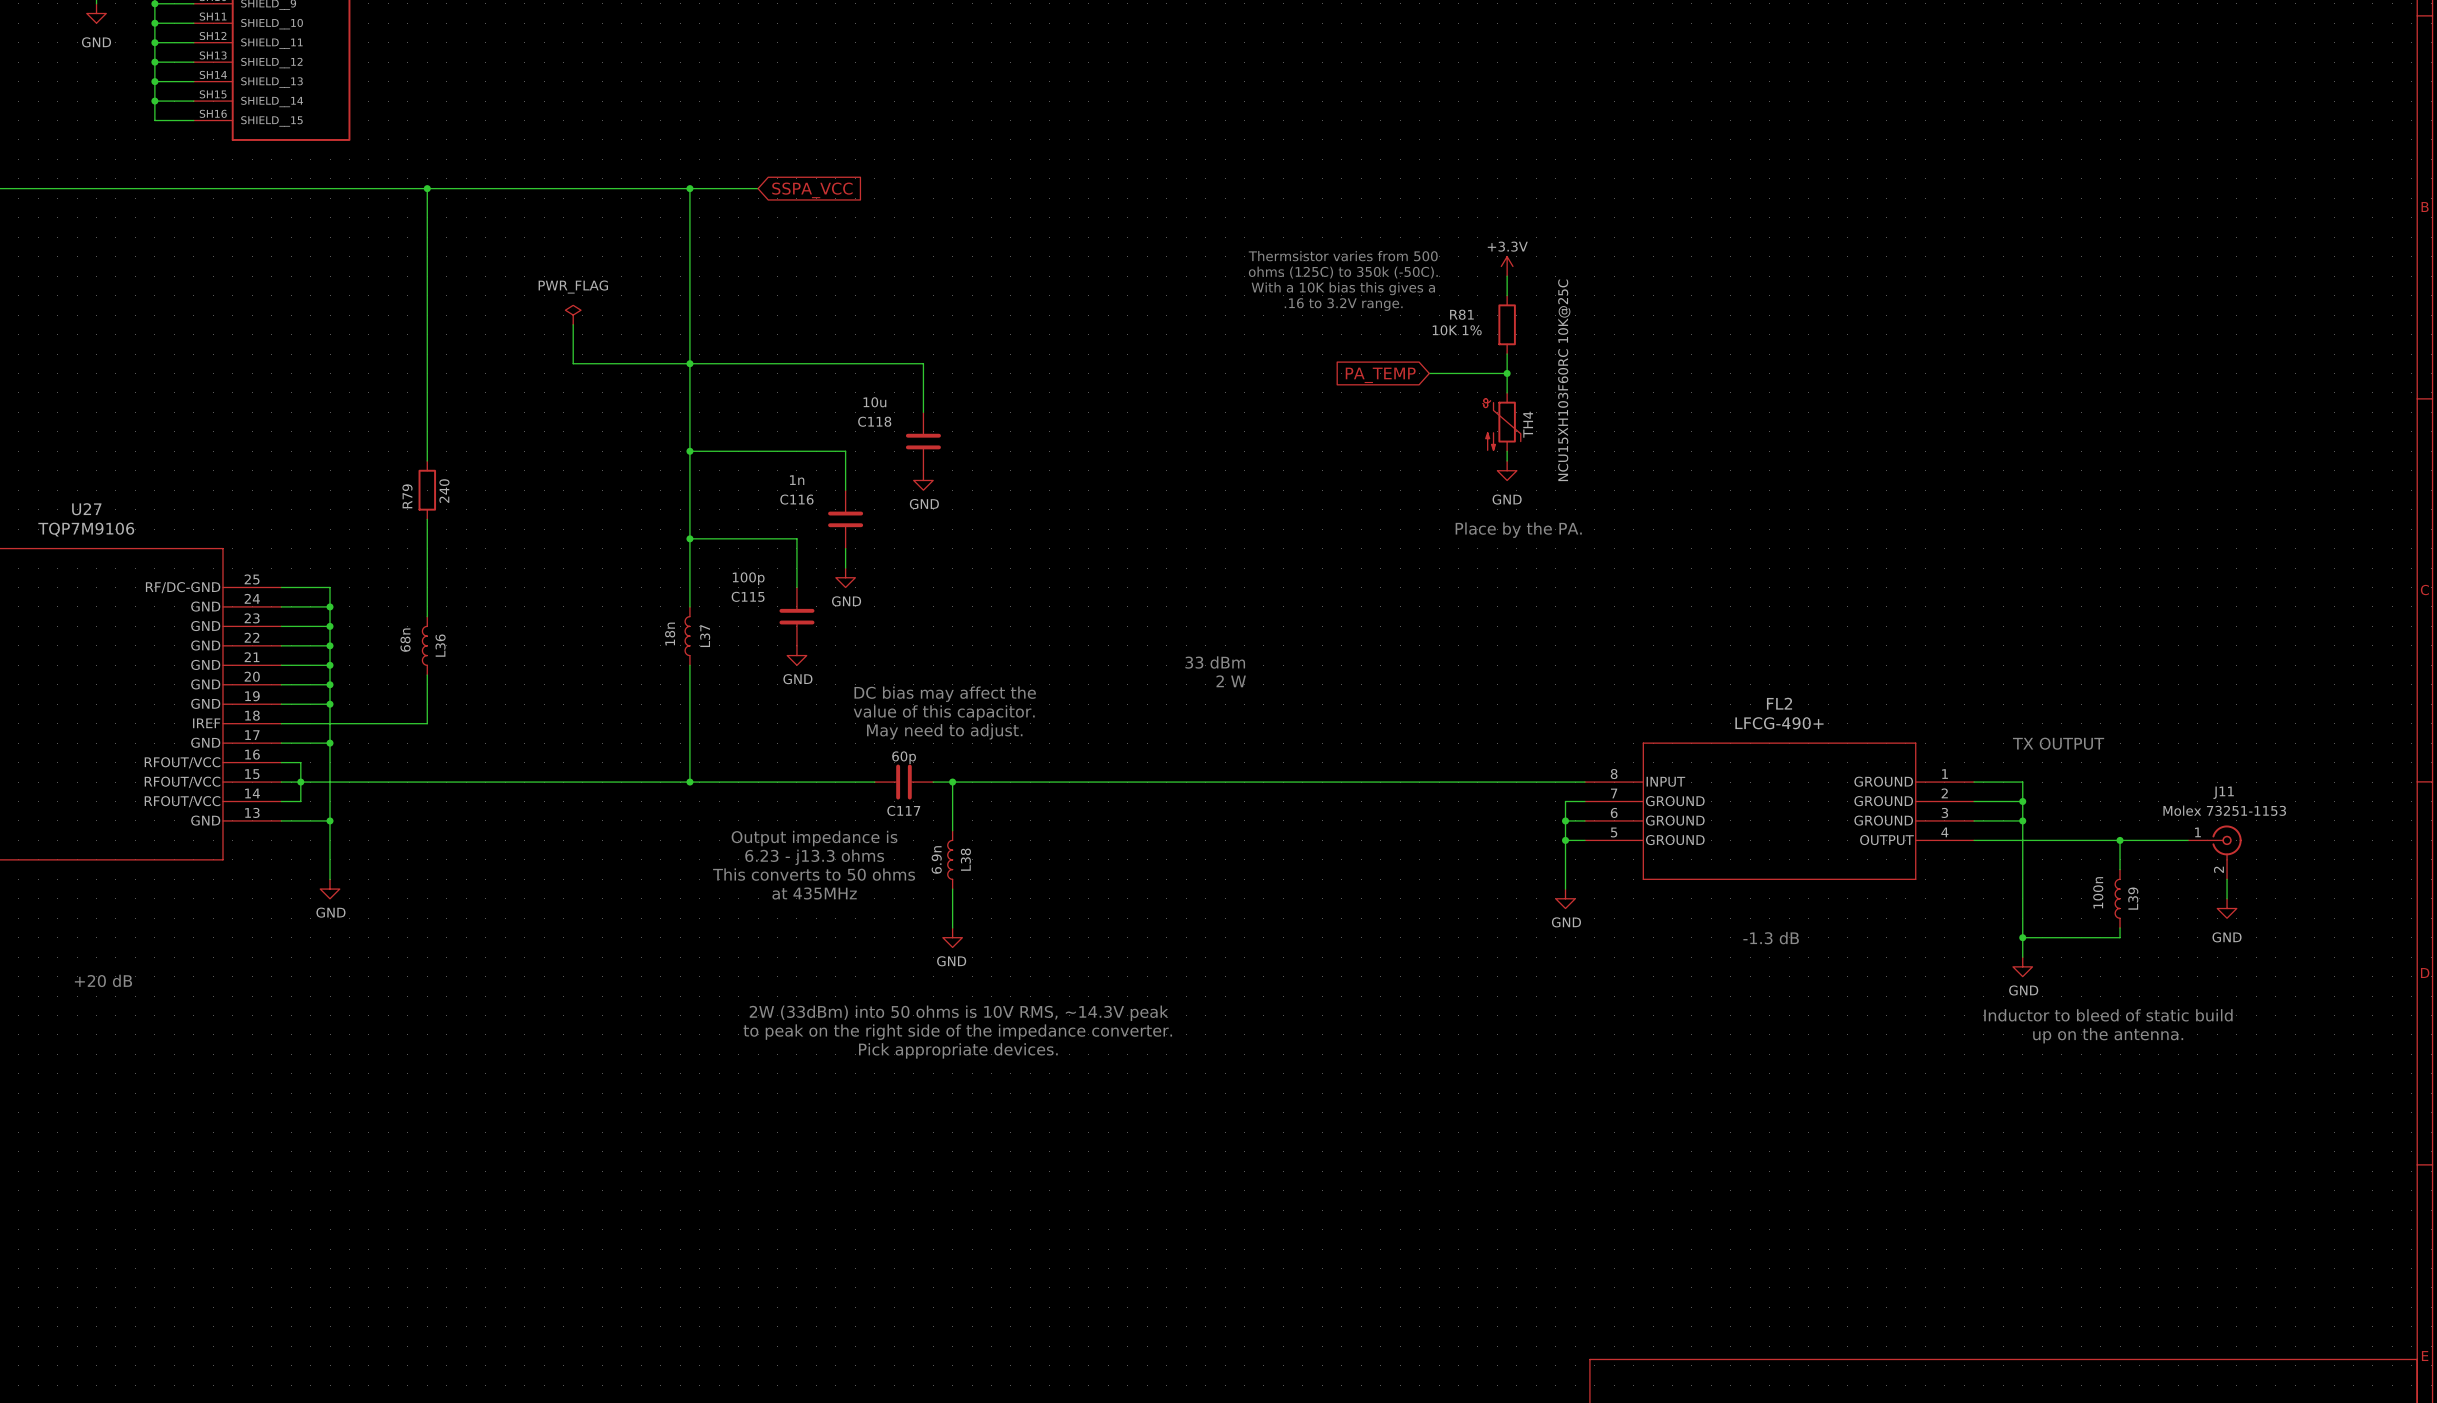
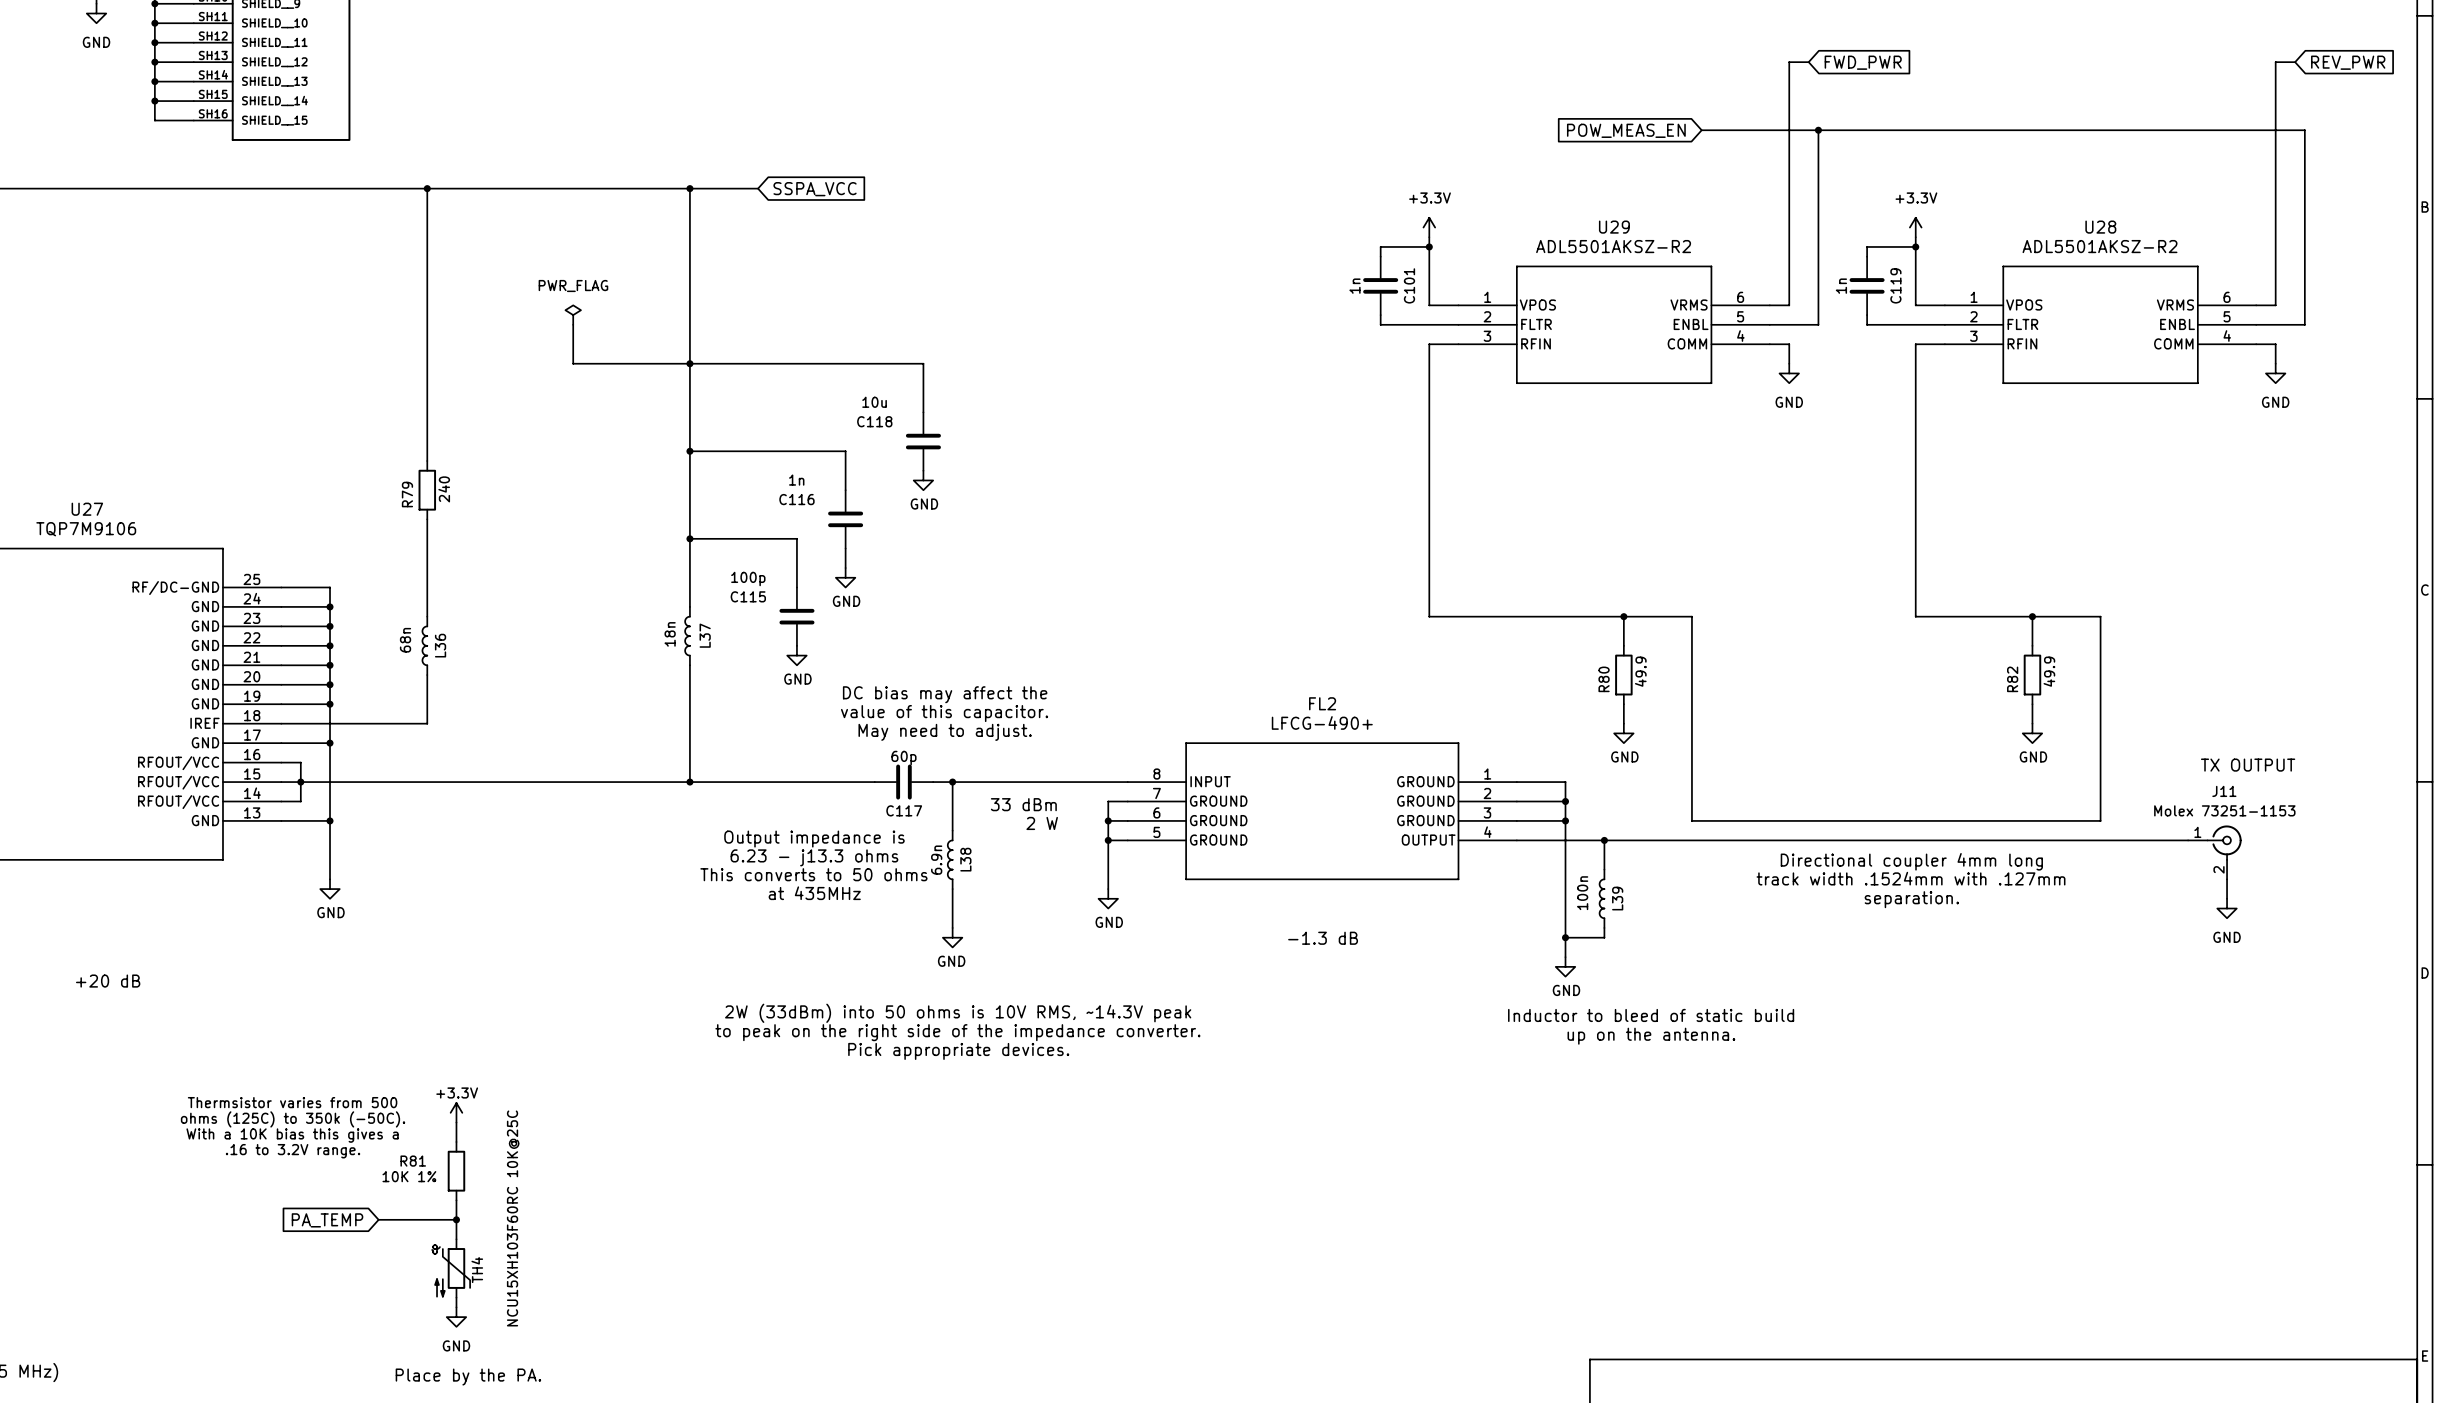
wire: none -> (1808, 62) (1789, 62) (1789, 305) (1769, 305)
wire: none -> (2295, 62) (2275, 62) (2275, 305) (2256, 305)
global label: none -> FWD_PWR (1863, 62)
global label: none -> REV_PWR (2348, 62)
wire: none -> (1701, 130) (2304, 130) (2304, 324) (2256, 324)
wire: none -> (1818, 130) (1818, 324) (1769, 324)
junction: none -> (1818, 130)
global label: none -> POW_MEAS_EN (1626, 130)
power symbol: none -> +3.3V (1915, 227)
wire: none -> (1429, 237) (1429, 305) (1458, 305)
wire: none -> (1915, 237) (1915, 305) (1944, 305)
wire: none -> (1429, 246) (1380, 246) (1380, 256)
junction: none -> (1429, 246)
power symbol text position: +3.3V (1507, 246) -> +3.3V (1430, 197)
wire: none -> (1915, 246) (1867, 246) (1867, 256)
junction: none -> (1915, 246)
text: Thermsistor varies from 500 (1343, 256) -> none
power symbol position: +3.3V (1507, 266) -> +3.3V (1429, 227)
text: ohms (125C) to 350k (-50C). (1343, 272) -> none
wire: (1507, 276) (1507, 295) -> none
C101: none -> 1n (1380, 285)
C119: none -> 1n (1867, 285)
text: With a 10K bias this gives a (1343, 288) -> none
text: .16 to 3.2V range. (1343, 304) -> none
wire: none -> (1380, 315) (1380, 324) (1458, 324)
wire: none -> (1867, 315) (1867, 324) (1944, 324)
R81 position: (1507, 324) -> (456, 1171)
U29: none -> ADL5501AKSZ-R2 (1614, 324)
U28: none -> ADL5501AKSZ-R2 (2100, 324)
wire: none -> (1458, 344) (1429, 344) (1429, 616) (1691, 616) (1691, 820) (1974, 820)
wire: none -> (1769, 344) (1789, 344) (1789, 363)
wire: none -> (1944, 344) (1915, 344) (1915, 616) (2100, 616) (2100, 820) (2022, 820)
wire: none -> (2256, 344) (2275, 344) (2275, 363)
wire: (1507, 354) (1507, 392) -> none
wire: (1429, 373) (1507, 373) -> none
junction: (1507, 373) -> none
power symbol: none -> GND (1789, 373)
power symbol: none -> GND (2275, 373)
global label: PA_TEMP (1380, 375) -> none
TH4 position: (1501, 422) -> (451, 1268)
wire: (1507, 451) (1507, 461) -> none
power symbol: GND (1507, 470) -> none
text: Place by the PA. (1518, 530) -> none
wire: none -> (1623, 616) (1623, 645)
junction: none -> (1623, 616)
wire: none -> (2032, 616) (2032, 645)
junction: none -> (2032, 616)
text: 33 dBm (1215, 662) -> none
R80: none -> 49.9 (1623, 675)
R82: none -> 49.9 (2032, 675)
text: 2 W (1231, 681) -> none
wire: none -> (1623, 704) (1623, 723)
wire: none -> (2032, 704) (2032, 723)
power symbol: none -> GND (1623, 733)
power symbol: none -> GND (2032, 733)
text position: TX OUTPUT (2058, 743) -> TX OUTPUT (2248, 765)
wire: (1127, 782) (1516, 782) -> none
wire: (1565, 782) (1584, 782) -> (1565, 782) (1565, 801) (1516, 801)
wire: (1974, 782) (2022, 782) (2022, 957) -> none
wire: none -> (1127, 801) (1108, 801) (1108, 889)
wire: (1565, 801) (1584, 801) -> none
junction: none -> (1565, 801)
wire: (1974, 801) (2022, 801) -> none
junction: (2022, 801) -> none
text: none -> 33 dBm (1023, 804)
FL2 position: (1779, 811) -> (1322, 811)
wire: none -> (1108, 820) (1127, 820)
junction: none -> (1108, 820)
wire: (1565, 820) (1584, 820) -> (1565, 820) (1516, 820)
junction: (2022, 820) -> none
text: none -> 2 W (1042, 823)
wire: none -> (1108, 840) (1127, 840)
junction: none -> (1108, 840)
wire: none -> (1516, 840) (1565, 840)
junction: (1565, 840) -> none
wire: none -> (1584, 840) (1974, 840)
wire: none -> (1604, 840) (1604, 869)
junction: none -> (1604, 840)
wire: (2120, 840) (2120, 869) -> none
junction: (2120, 840) -> none
text: none -> Directional coupler 4mm long (1911, 861)
text: none -> track width .1524mm with .127mm (1911, 878)
wire: none -> (1565, 889) (1565, 957)
power symbol: none -> GND (1108, 898)
power symbol position: GND (1565, 898) -> GND (1565, 966)
L39 position: (2117, 898) -> (1601, 898)
text: none -> separation. (1911, 899)
wire: none -> (1604, 927) (1604, 937) (1565, 937)
wire: (2120, 927) (2120, 937) (2022, 937) -> none
junction: none -> (1565, 937)
junction: (2022, 937) -> none
text: none -> -1.3 dB (1323, 938)
text: -1.3 dB (1771, 938) -> none
power symbol: GND (2022, 966) -> none
text: none -> Inductor to bleed of static build (1651, 1015)
text: Inductor to bleed of static build (2108, 1015) -> none
text: none -> up on the antenna. (1651, 1036)
text: up on the antenna. (2108, 1035) -> none
text: none -> Thermsistor varies from 500 (292, 1102)
power symbol: none -> +3.3V (456, 1112)
text: none -> ohms (125C) to 350k (-50C). (293, 1119)
wire: none -> (456, 1122) (456, 1142)
text: none -> With a 10K bias this gives a (292, 1135)
text: none -> .16 to 3.2V range. (293, 1151)
wire: none -> (456, 1200) (456, 1239)
wire: none -> (378, 1219) (456, 1219)
junction: none -> (456, 1219)
global label: none -> PA_TEMP (327, 1220)
wire: none -> (456, 1297) (456, 1307)
power symbol: none -> GND (456, 1317)
text: none -> Place by the PA. (468, 1377)

